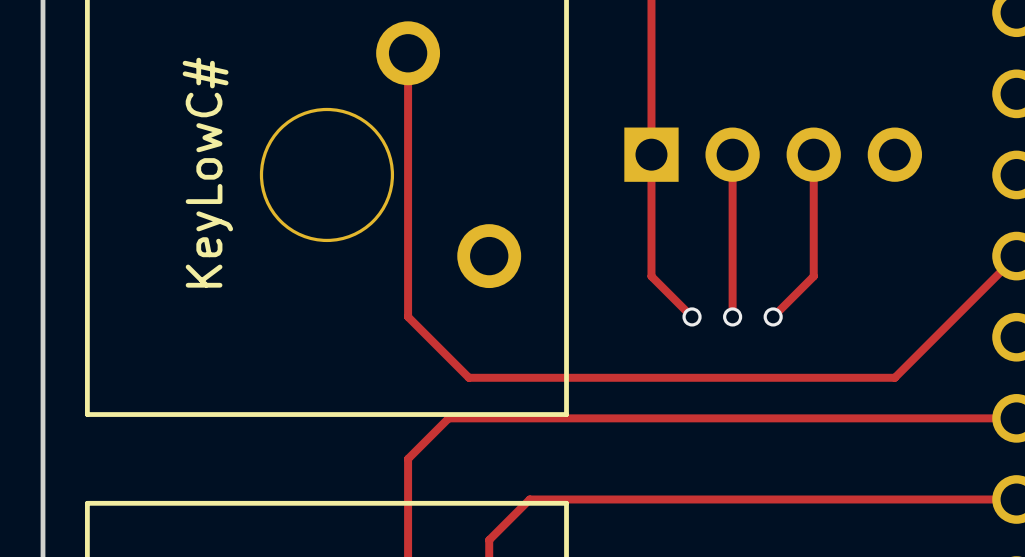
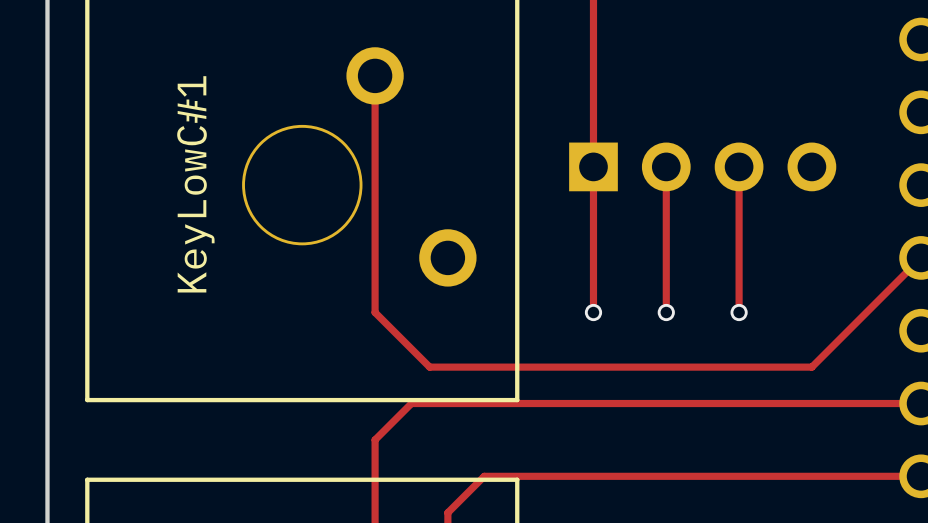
KeyLowC# name: KeyLowC# (207, 172) -> KeyLowC#1 (195, 184)
track: (651, 276) (692, 316) -> (593, 276) (593, 312)
track: (813, 276) (773, 316) -> (739, 276) (739, 312)
via position: (692, 316) -> (593, 312)
via position: (773, 316) -> (739, 312)

